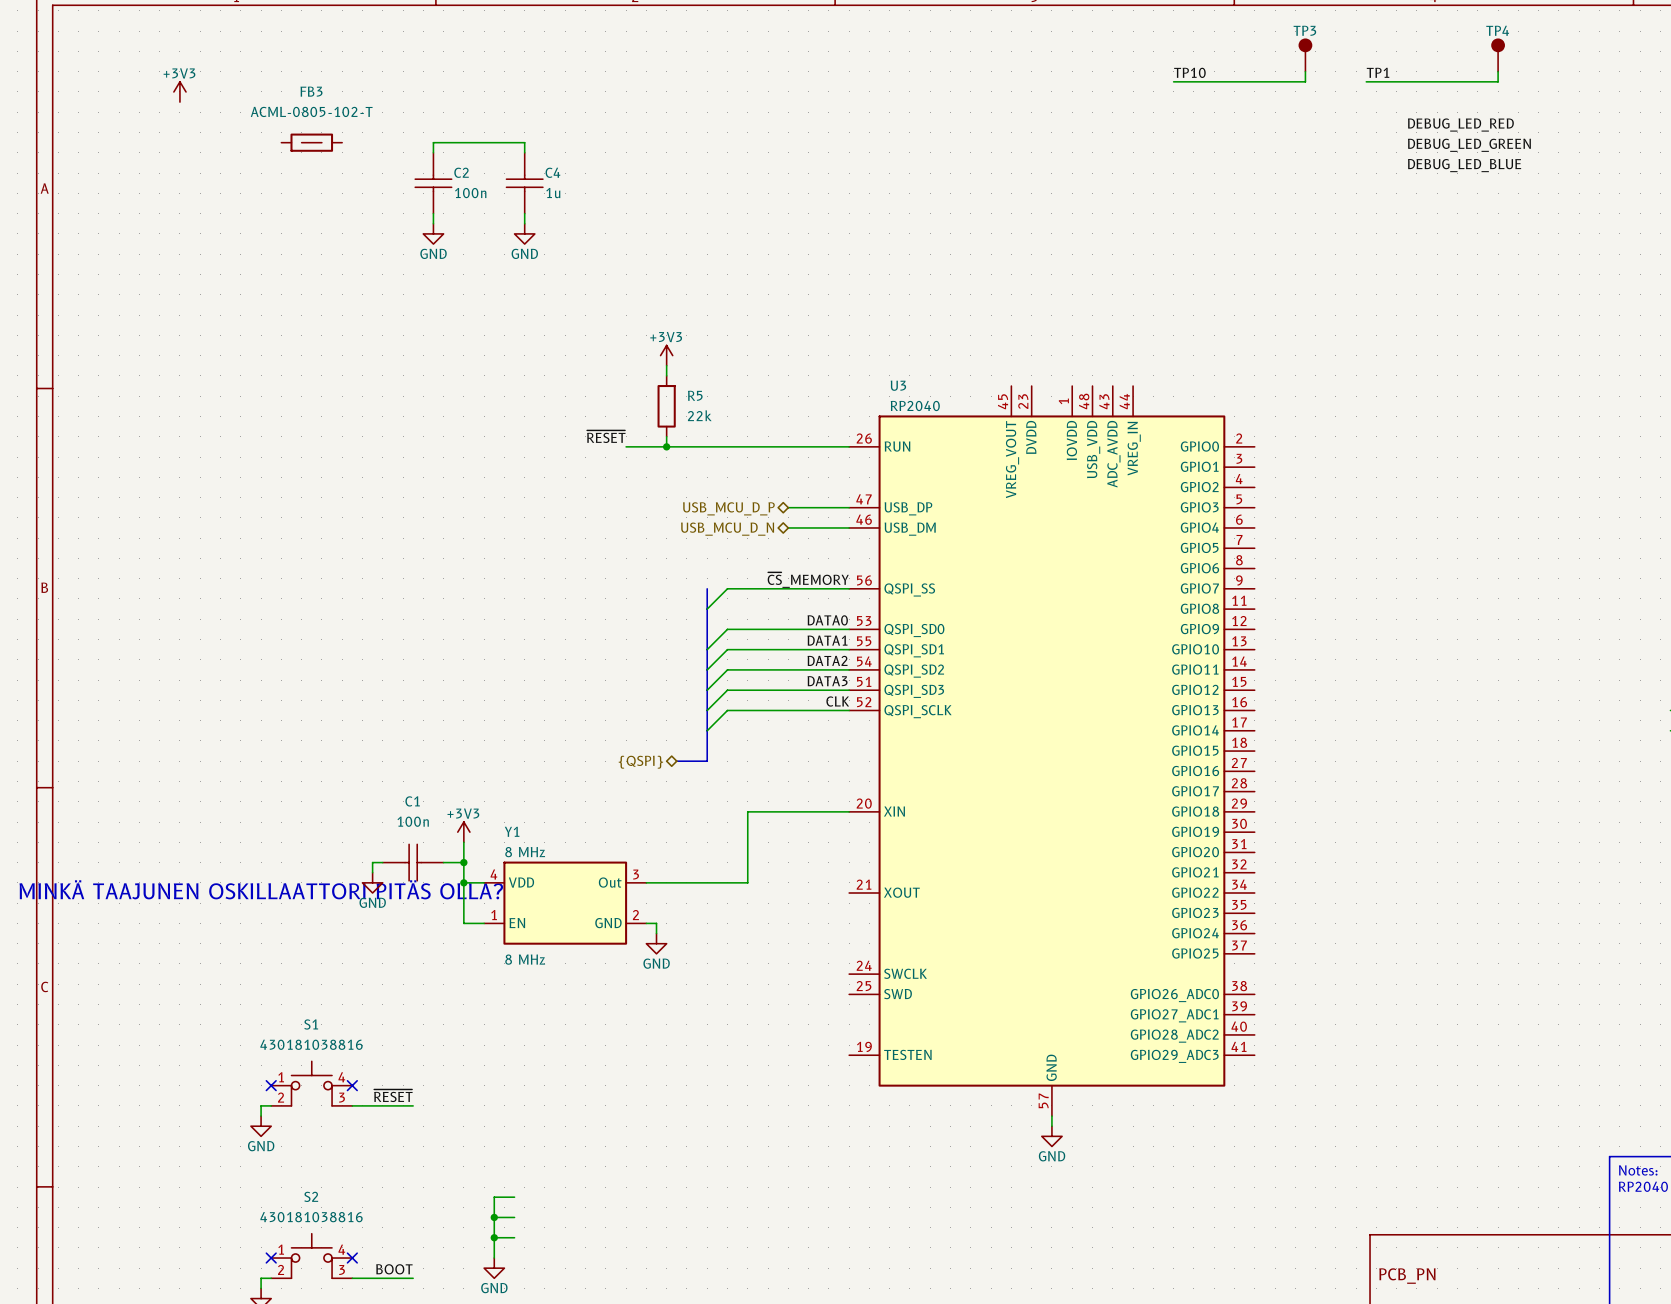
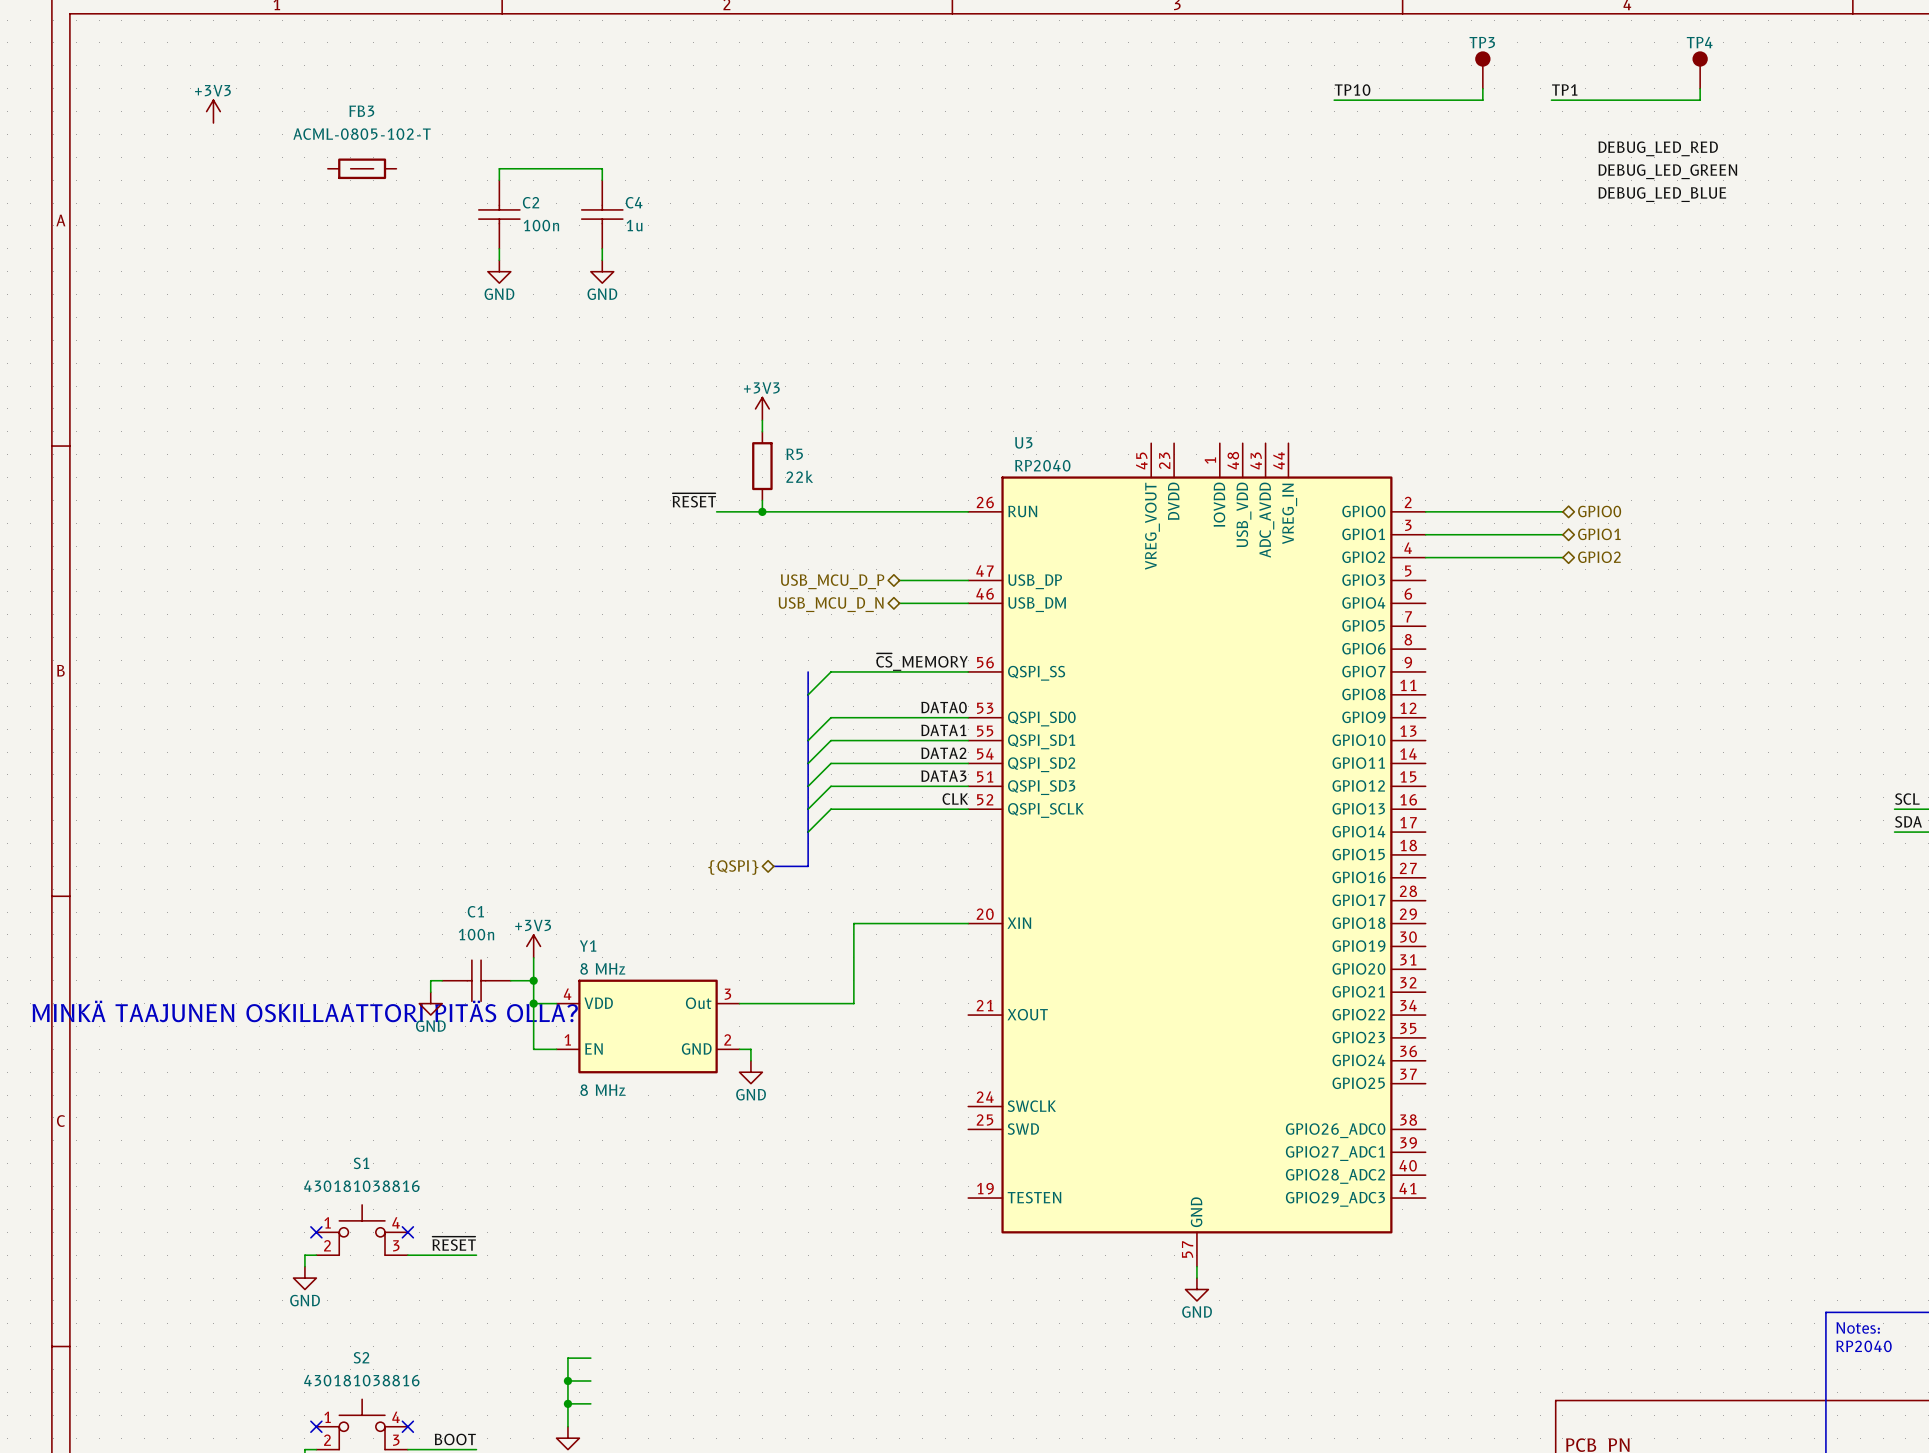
wire: none -> (1425, 511) (1562, 511)
hierarchical label: none -> GPIO0 (1599, 511)
hierarchical label: none -> GPIO1 (1599, 534)
wire: none -> (1425, 534) (1562, 534)
wire: none -> (1425, 557) (1562, 557)
hierarchical label: none -> GPIO2 (1599, 557)

